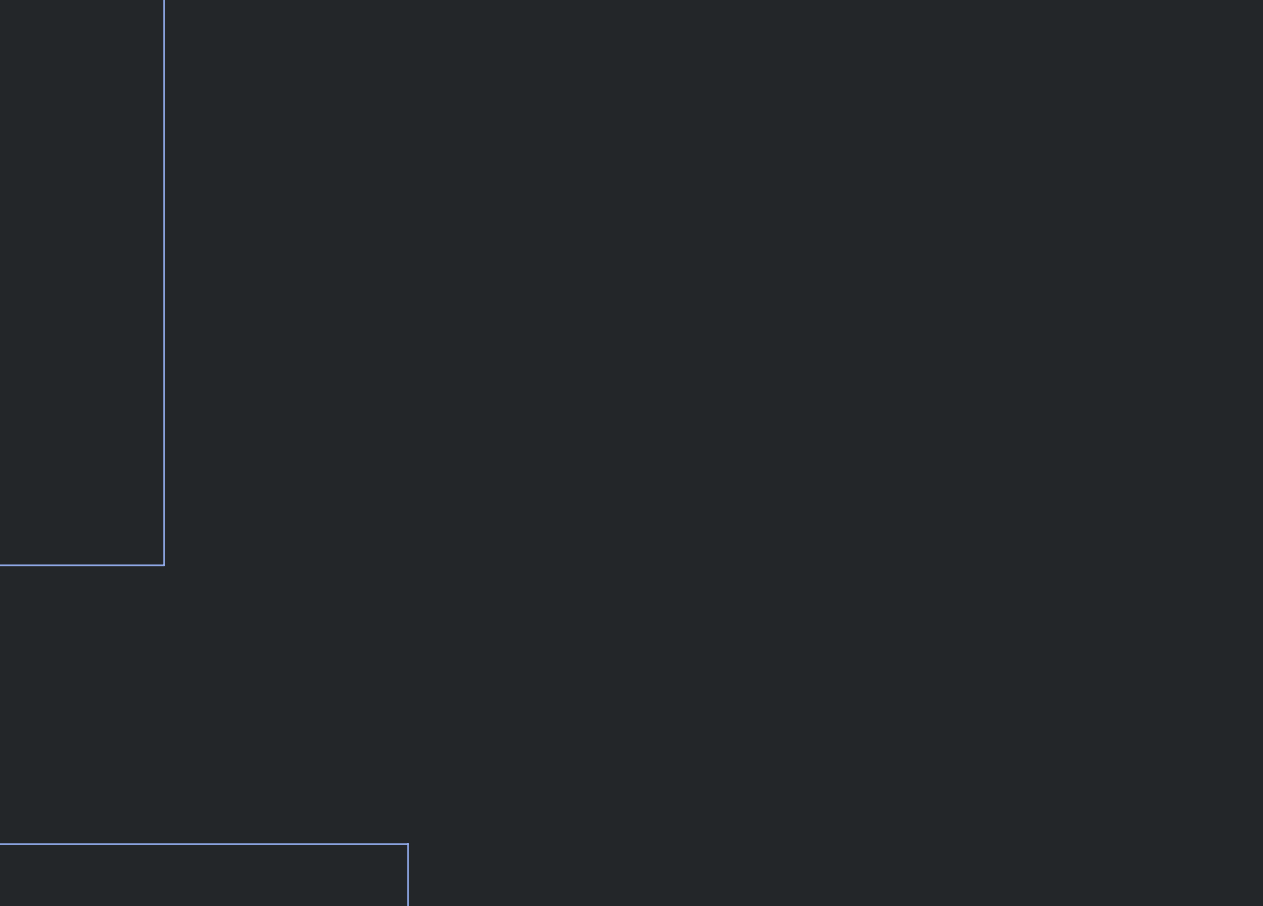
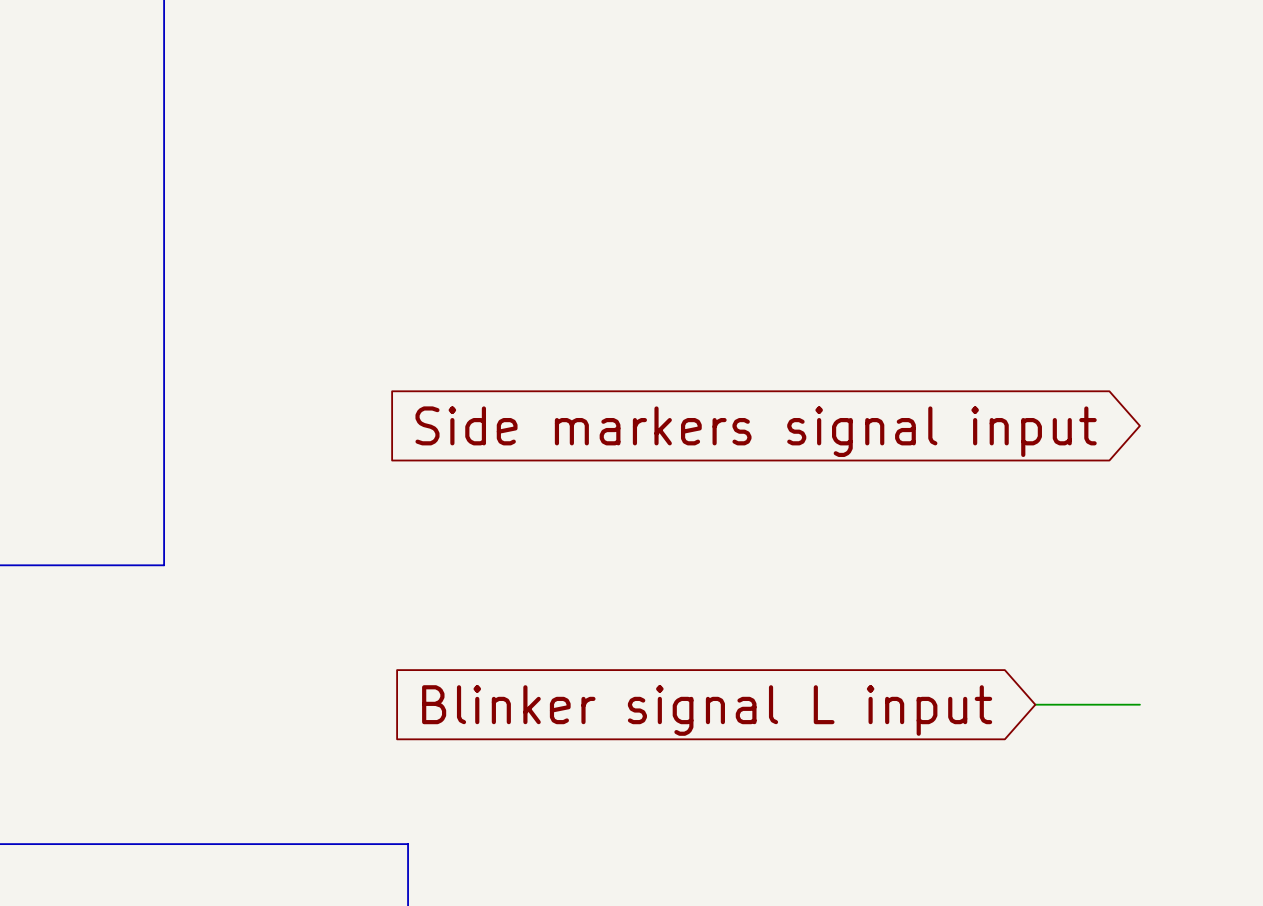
global label: none -> Side markers signal input (756, 431)
wire: none -> (1035, 704) (1139, 704)
global label: none -> Blinker signal L input (707, 710)

